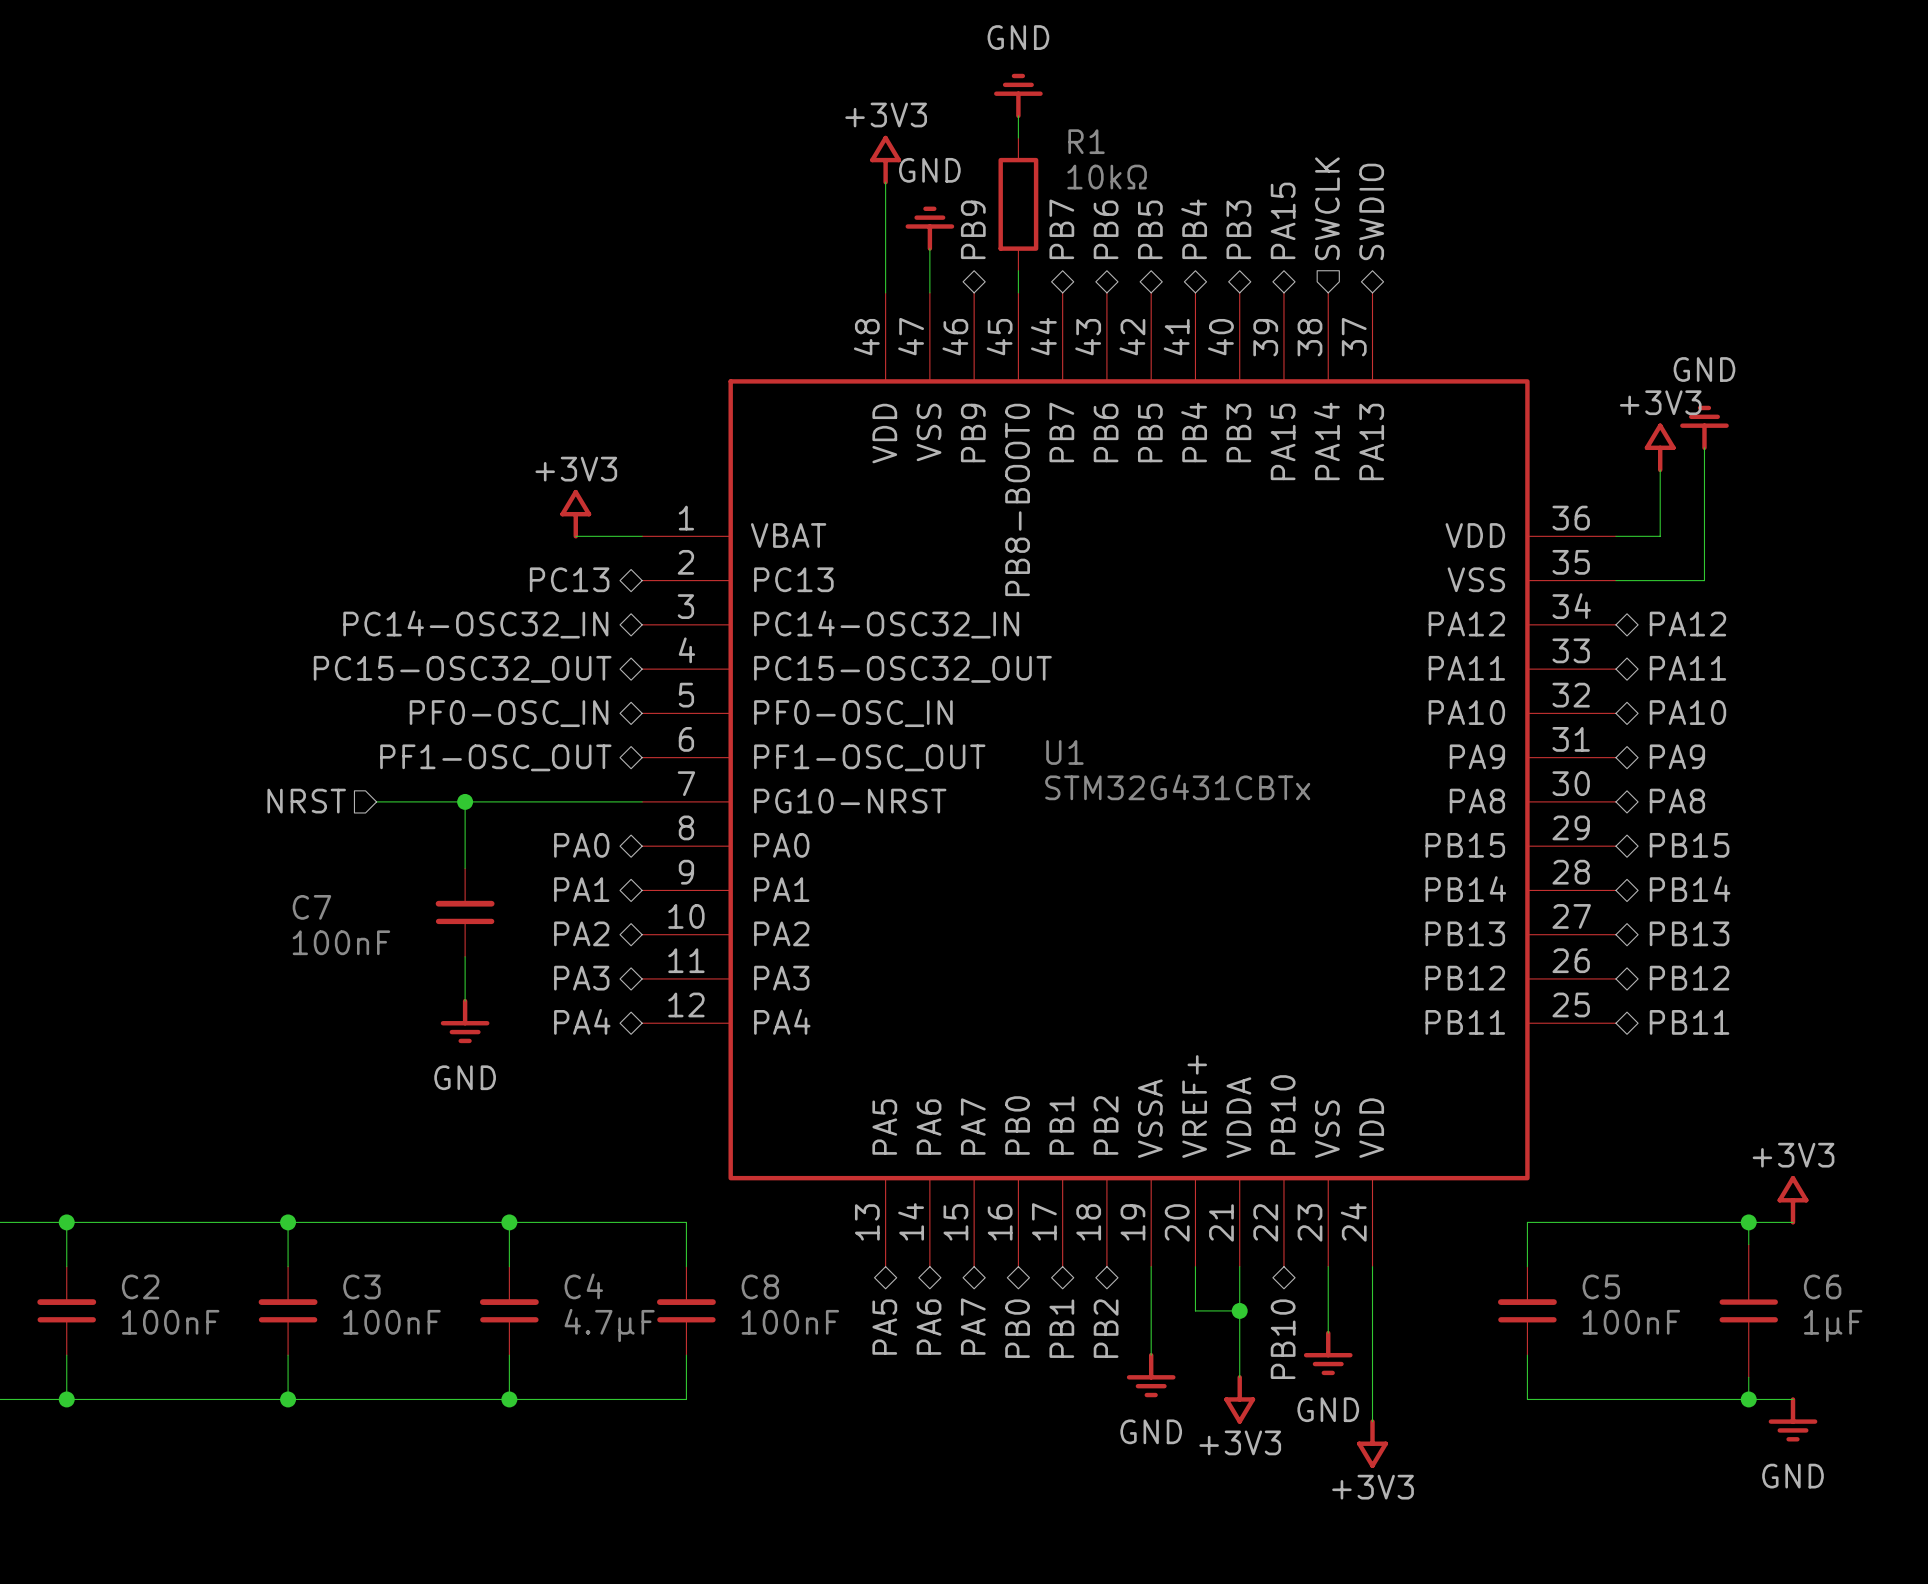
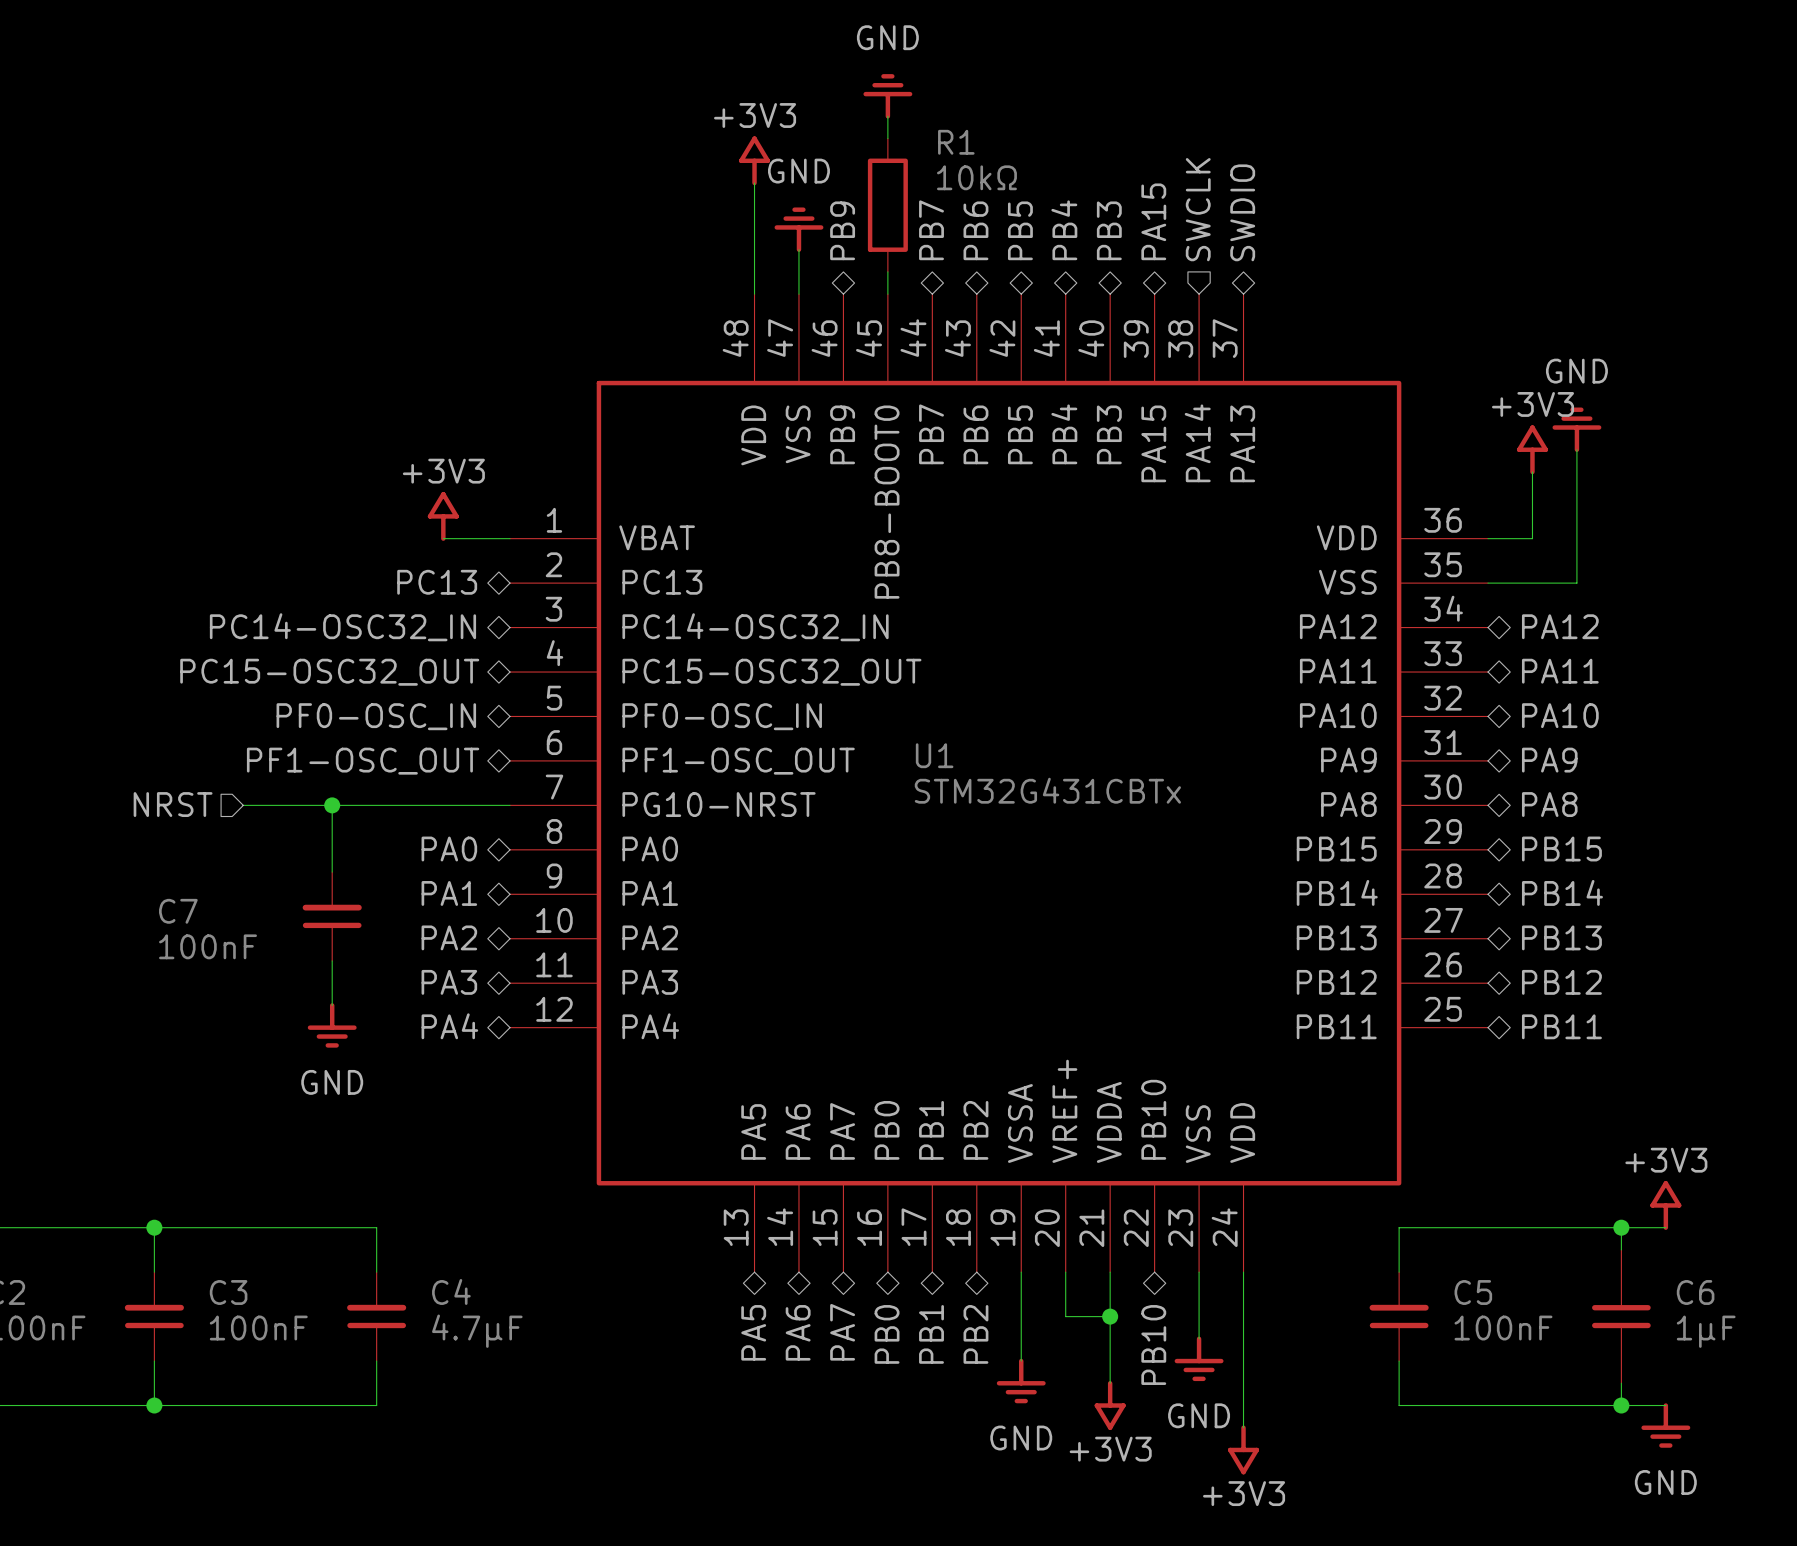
wire: (509, 1222) (686, 1222) (686, 1266) -> none
junction: (509, 1222) -> none
text: C8 (760, 1286) -> none
part: (686, 1310) -> none
text: 100nF (790, 1322) -> none
wire: (686, 1355) (686, 1399) (509, 1399) -> none
junction: (509, 1399) -> none

